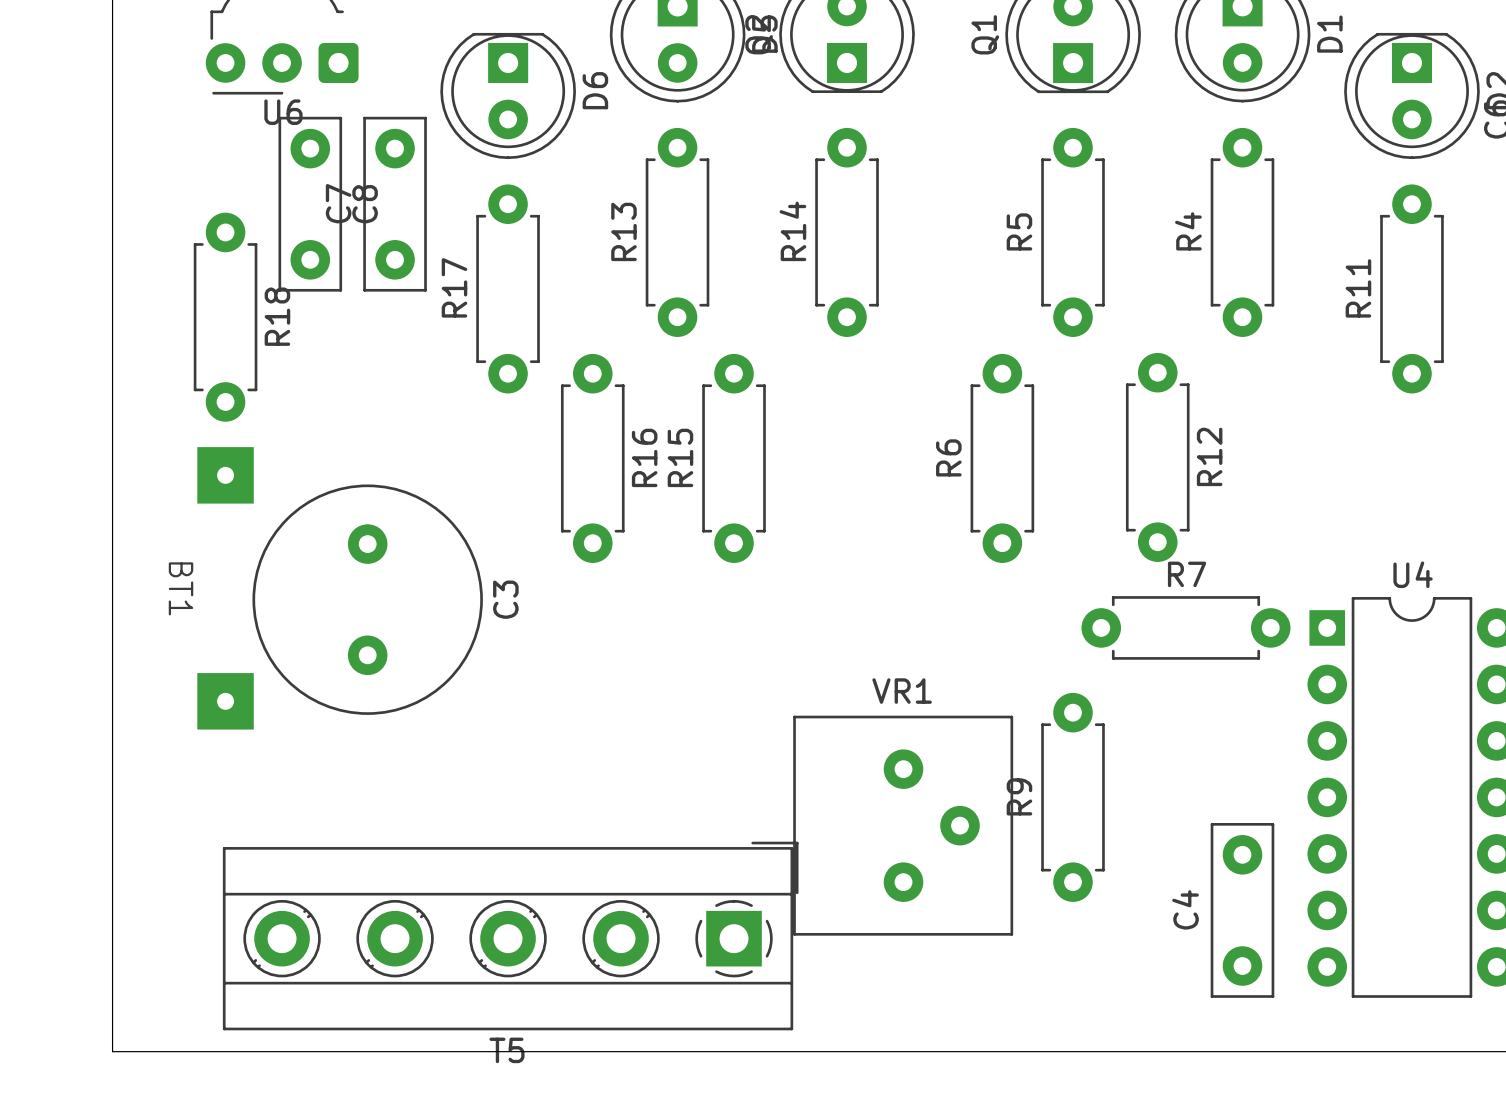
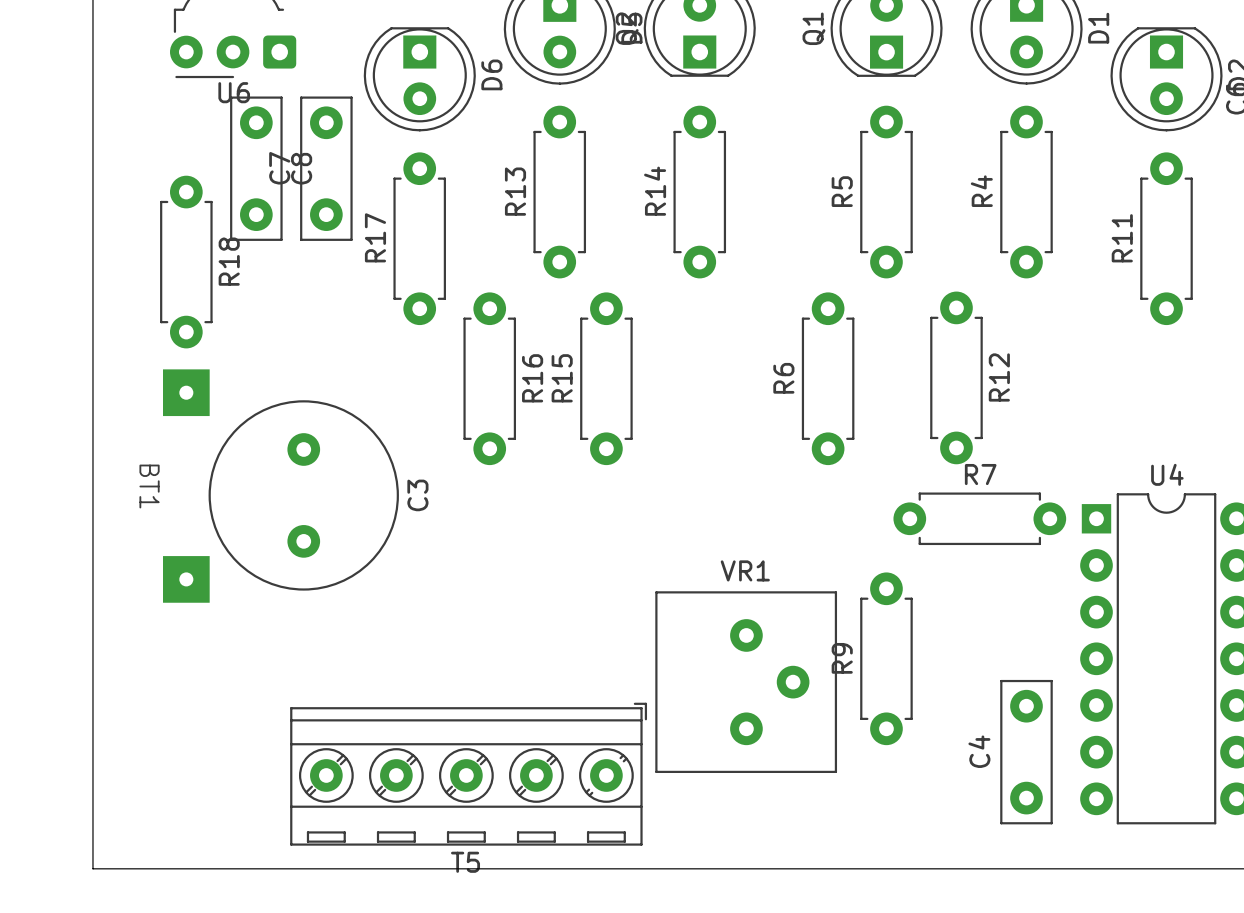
T5 footprint: [222, 841, 799, 1031] -> [290, 702, 648, 846]

